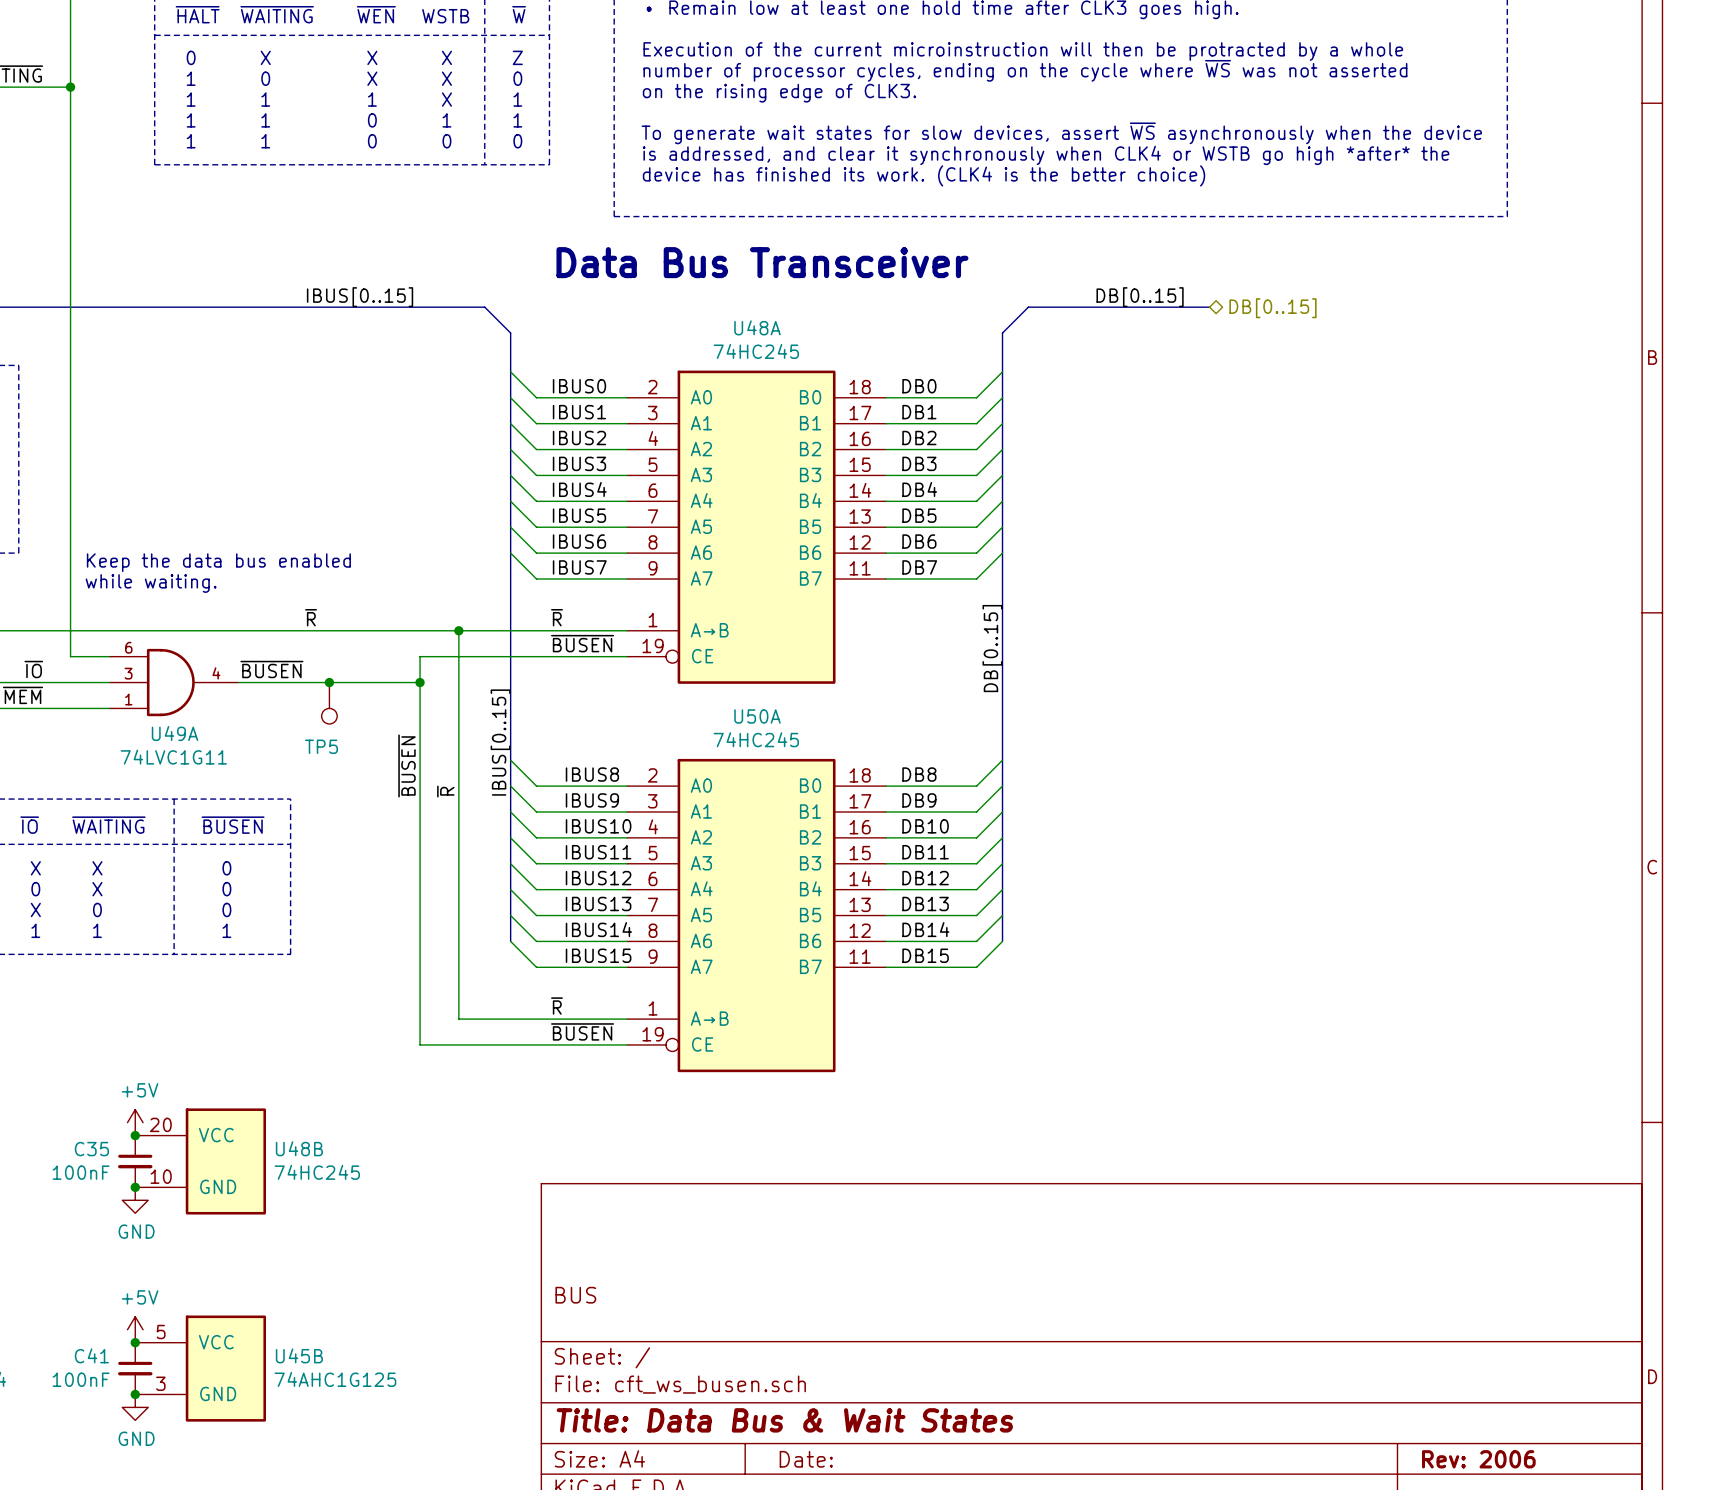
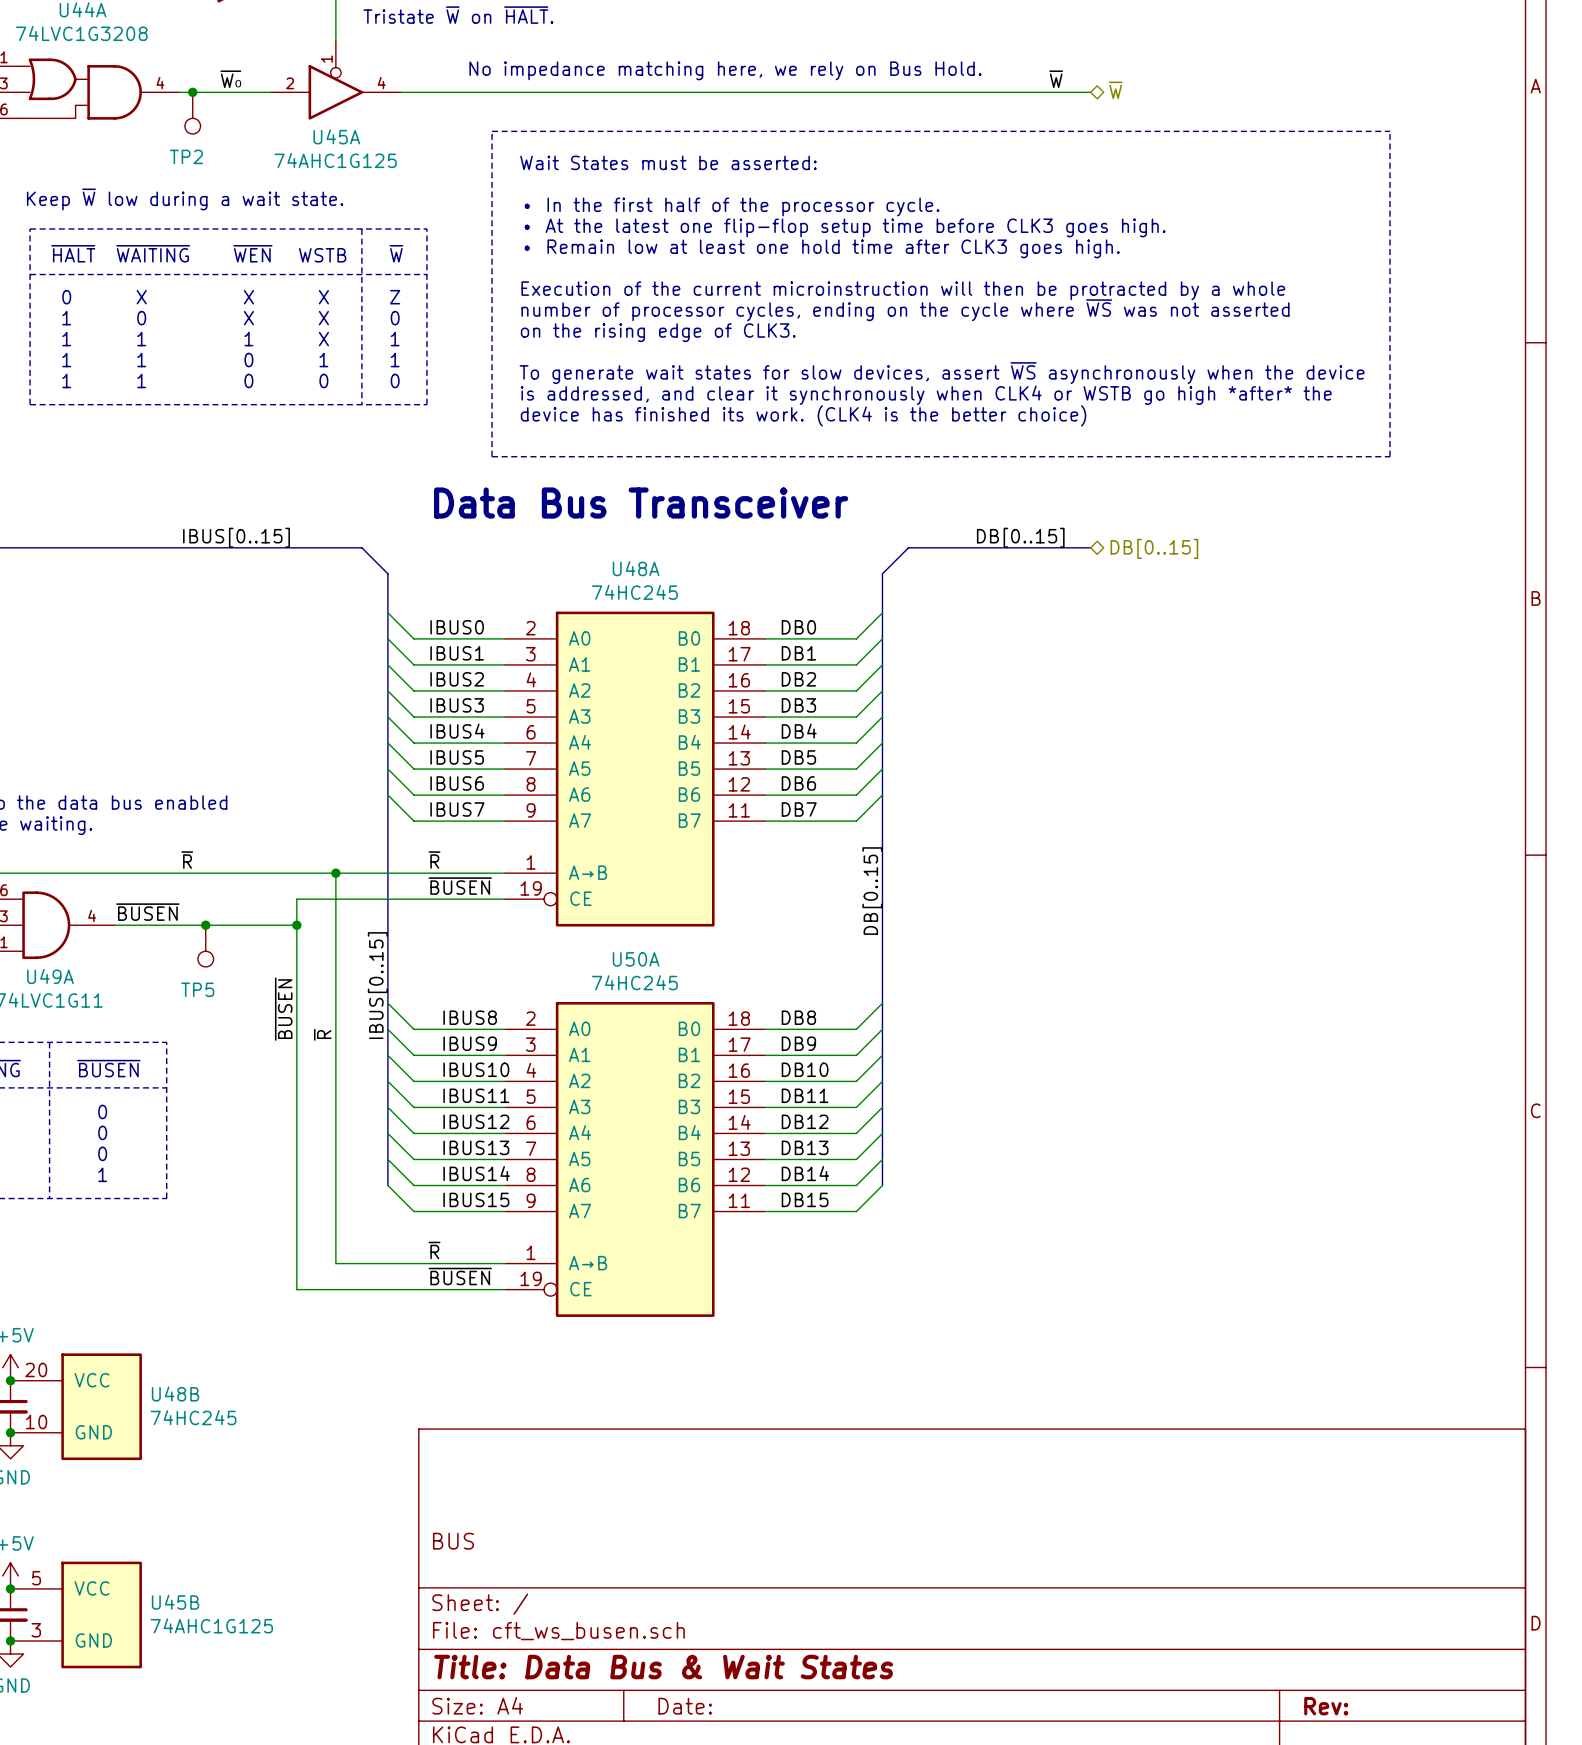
title block: Rev: 2006 (1478, 1459) -> Rev: (1326, 1706)

